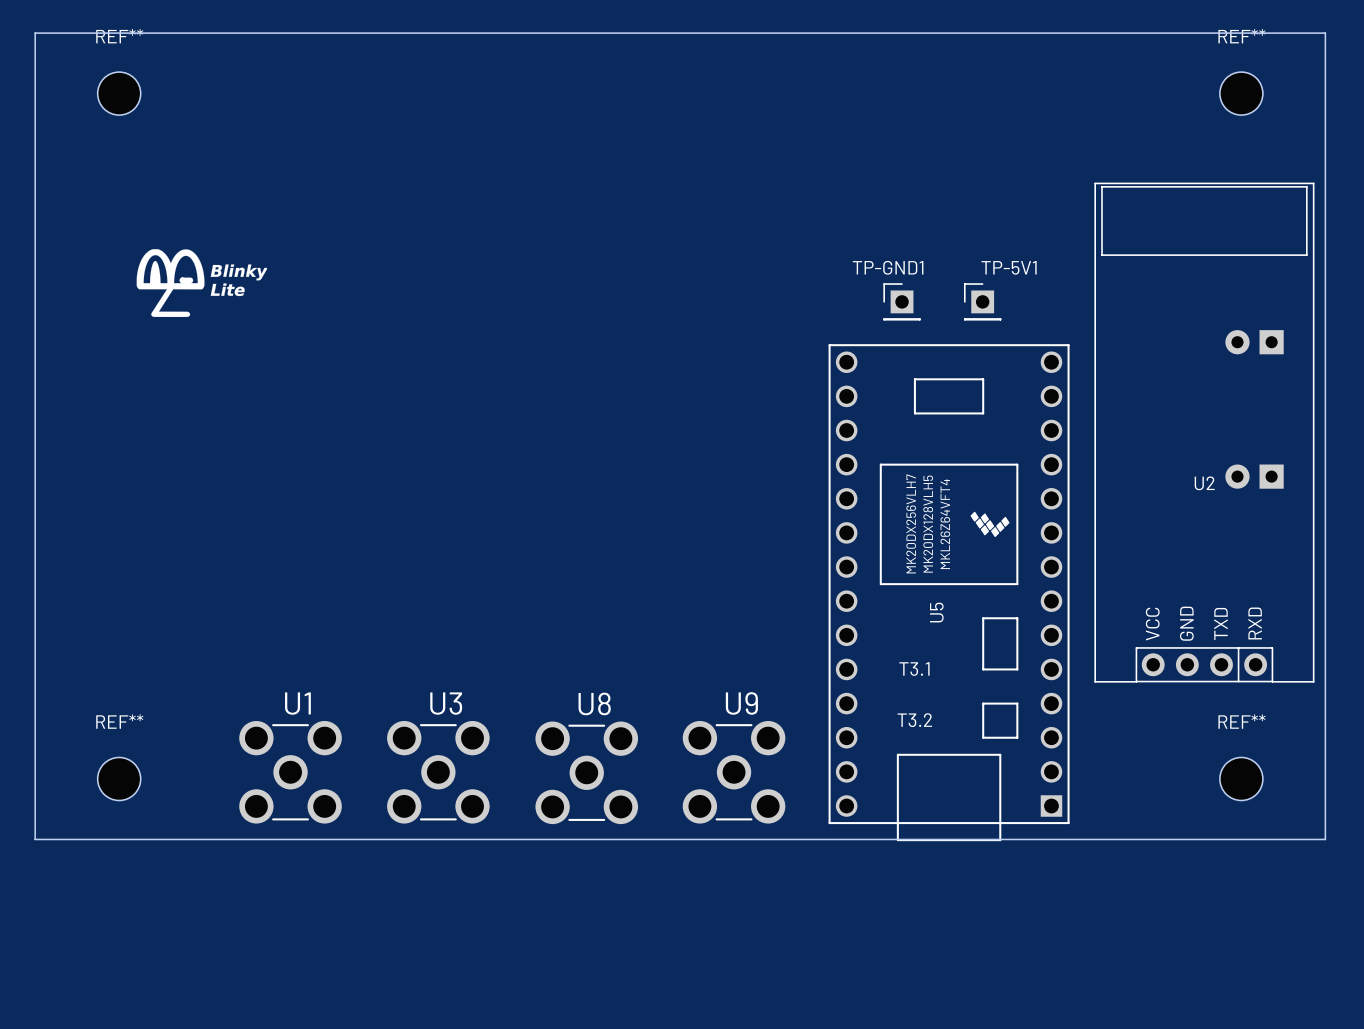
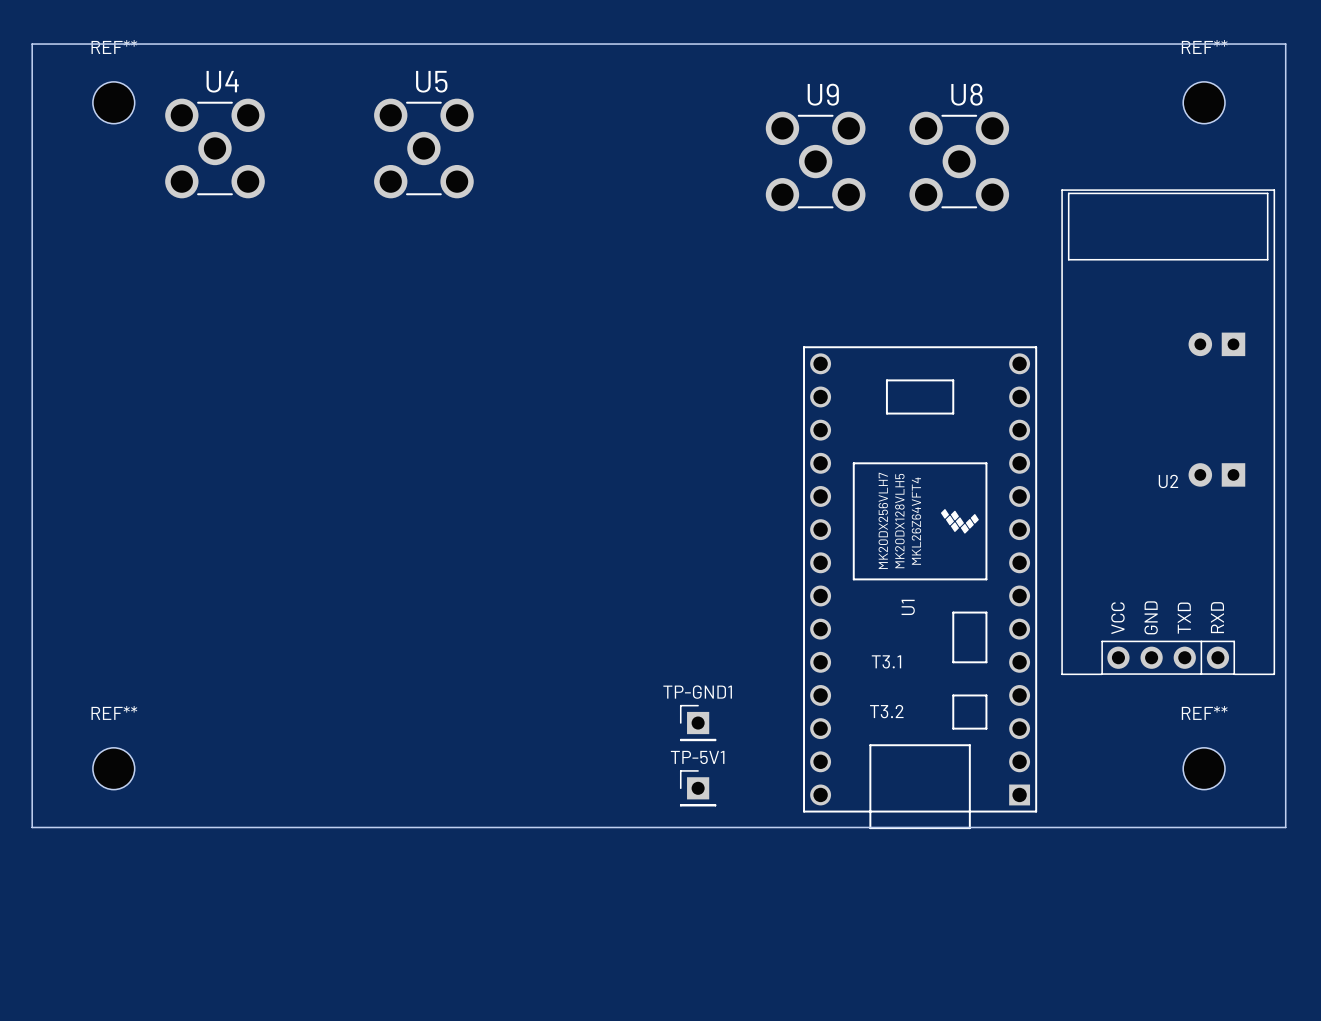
U4: none -> (214, 148)
U5: none -> (423, 148)
drawing: [136, 249, 268, 318] -> none
TP-GND1 name position: TP-GND1 (888, 267) -> TP-GND1 (697, 692)
TP-5V1 name position: TP-5V1 (1009, 267) -> TP-5V1 (697, 757)
TP-GND1 position: (902, 301) -> (698, 723)
TP-5V1 position: (982, 301) -> (698, 788)
U5 name: U5 (936, 612) -> U1 (908, 607)
U1: (290, 772) -> none
U3: (438, 772) -> none
U8 position: (586, 772) -> (959, 161)
U9 position: (734, 772) -> (815, 161)

